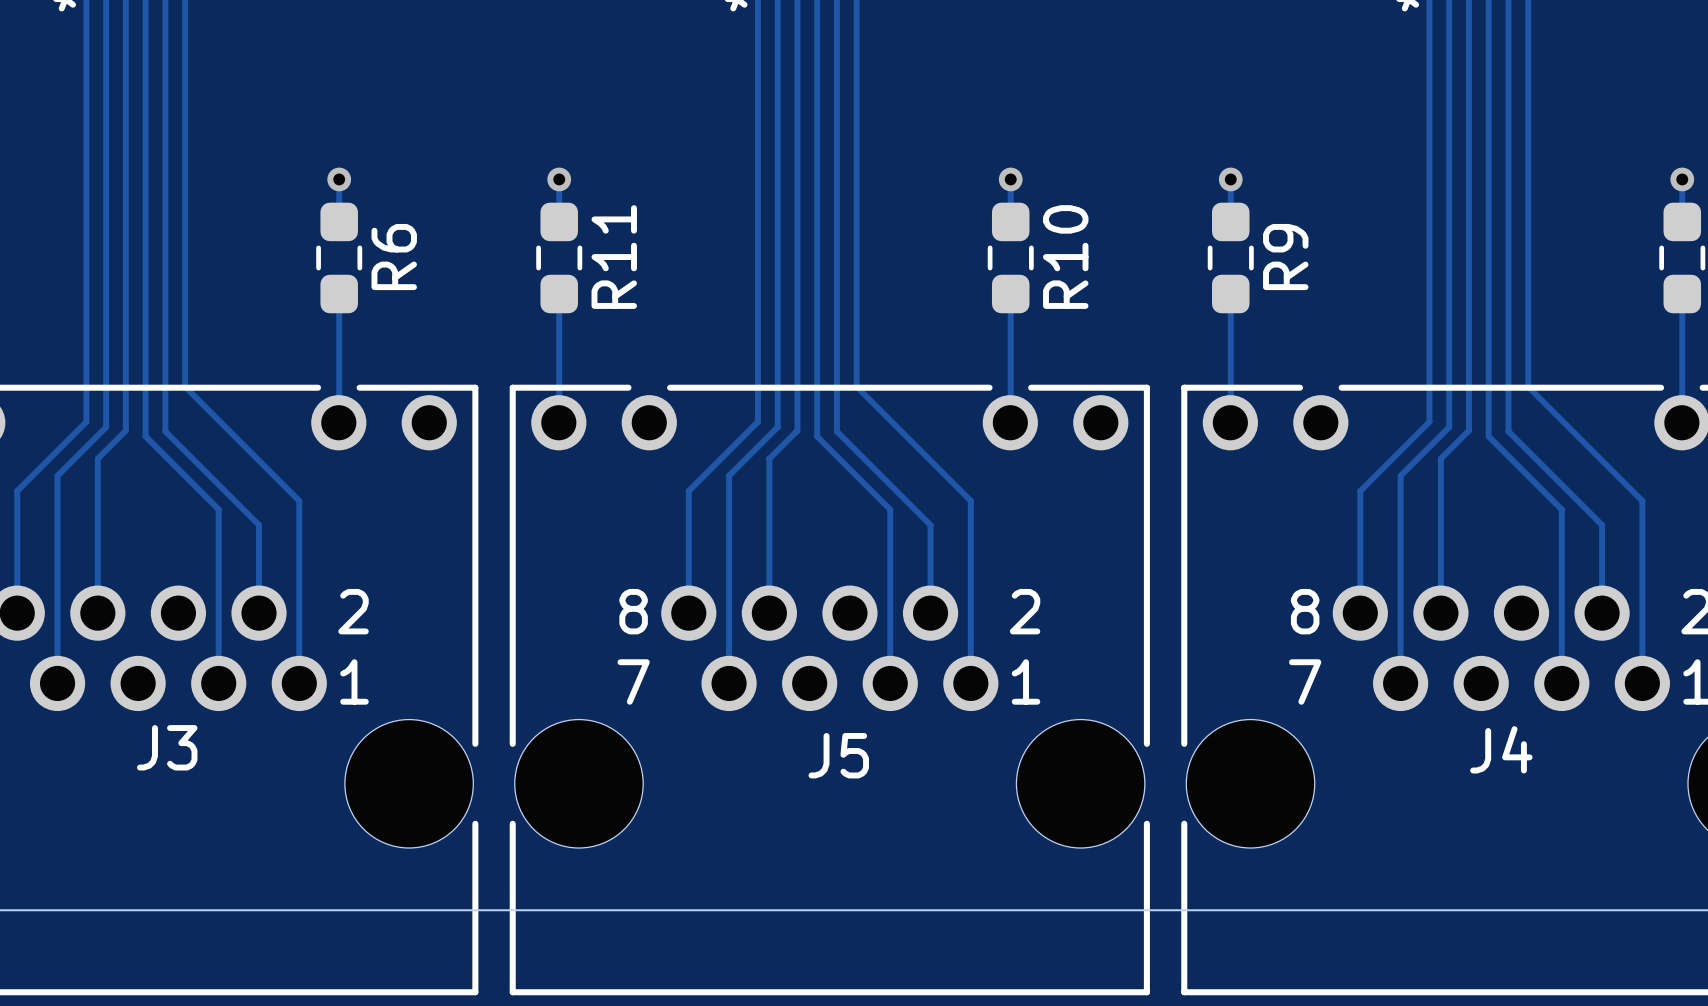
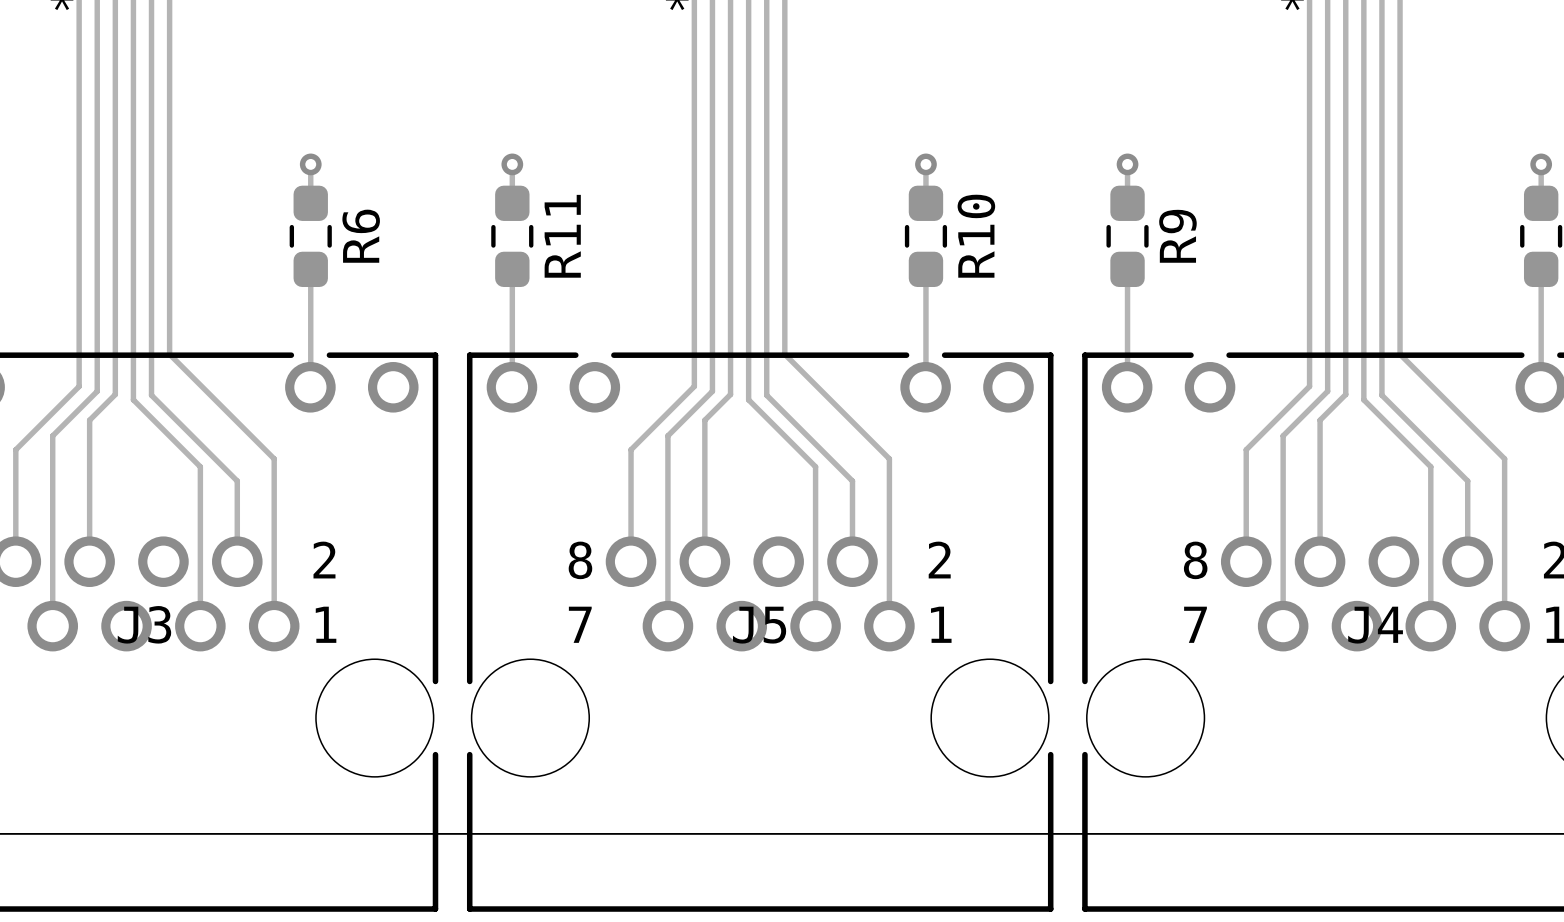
J3 name position: J3 (167, 747) -> J3 (144, 624)
J4 name position: J4 (1501, 749) -> J4 (1375, 625)
J5 name position: J5 (838, 755) -> J5 (759, 625)

